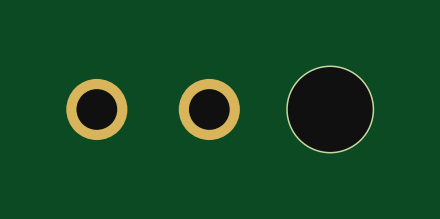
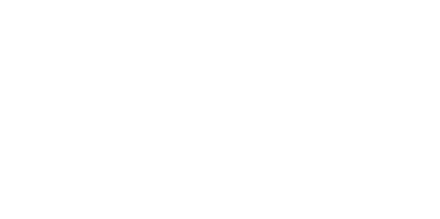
part: (219, 109) -> none

